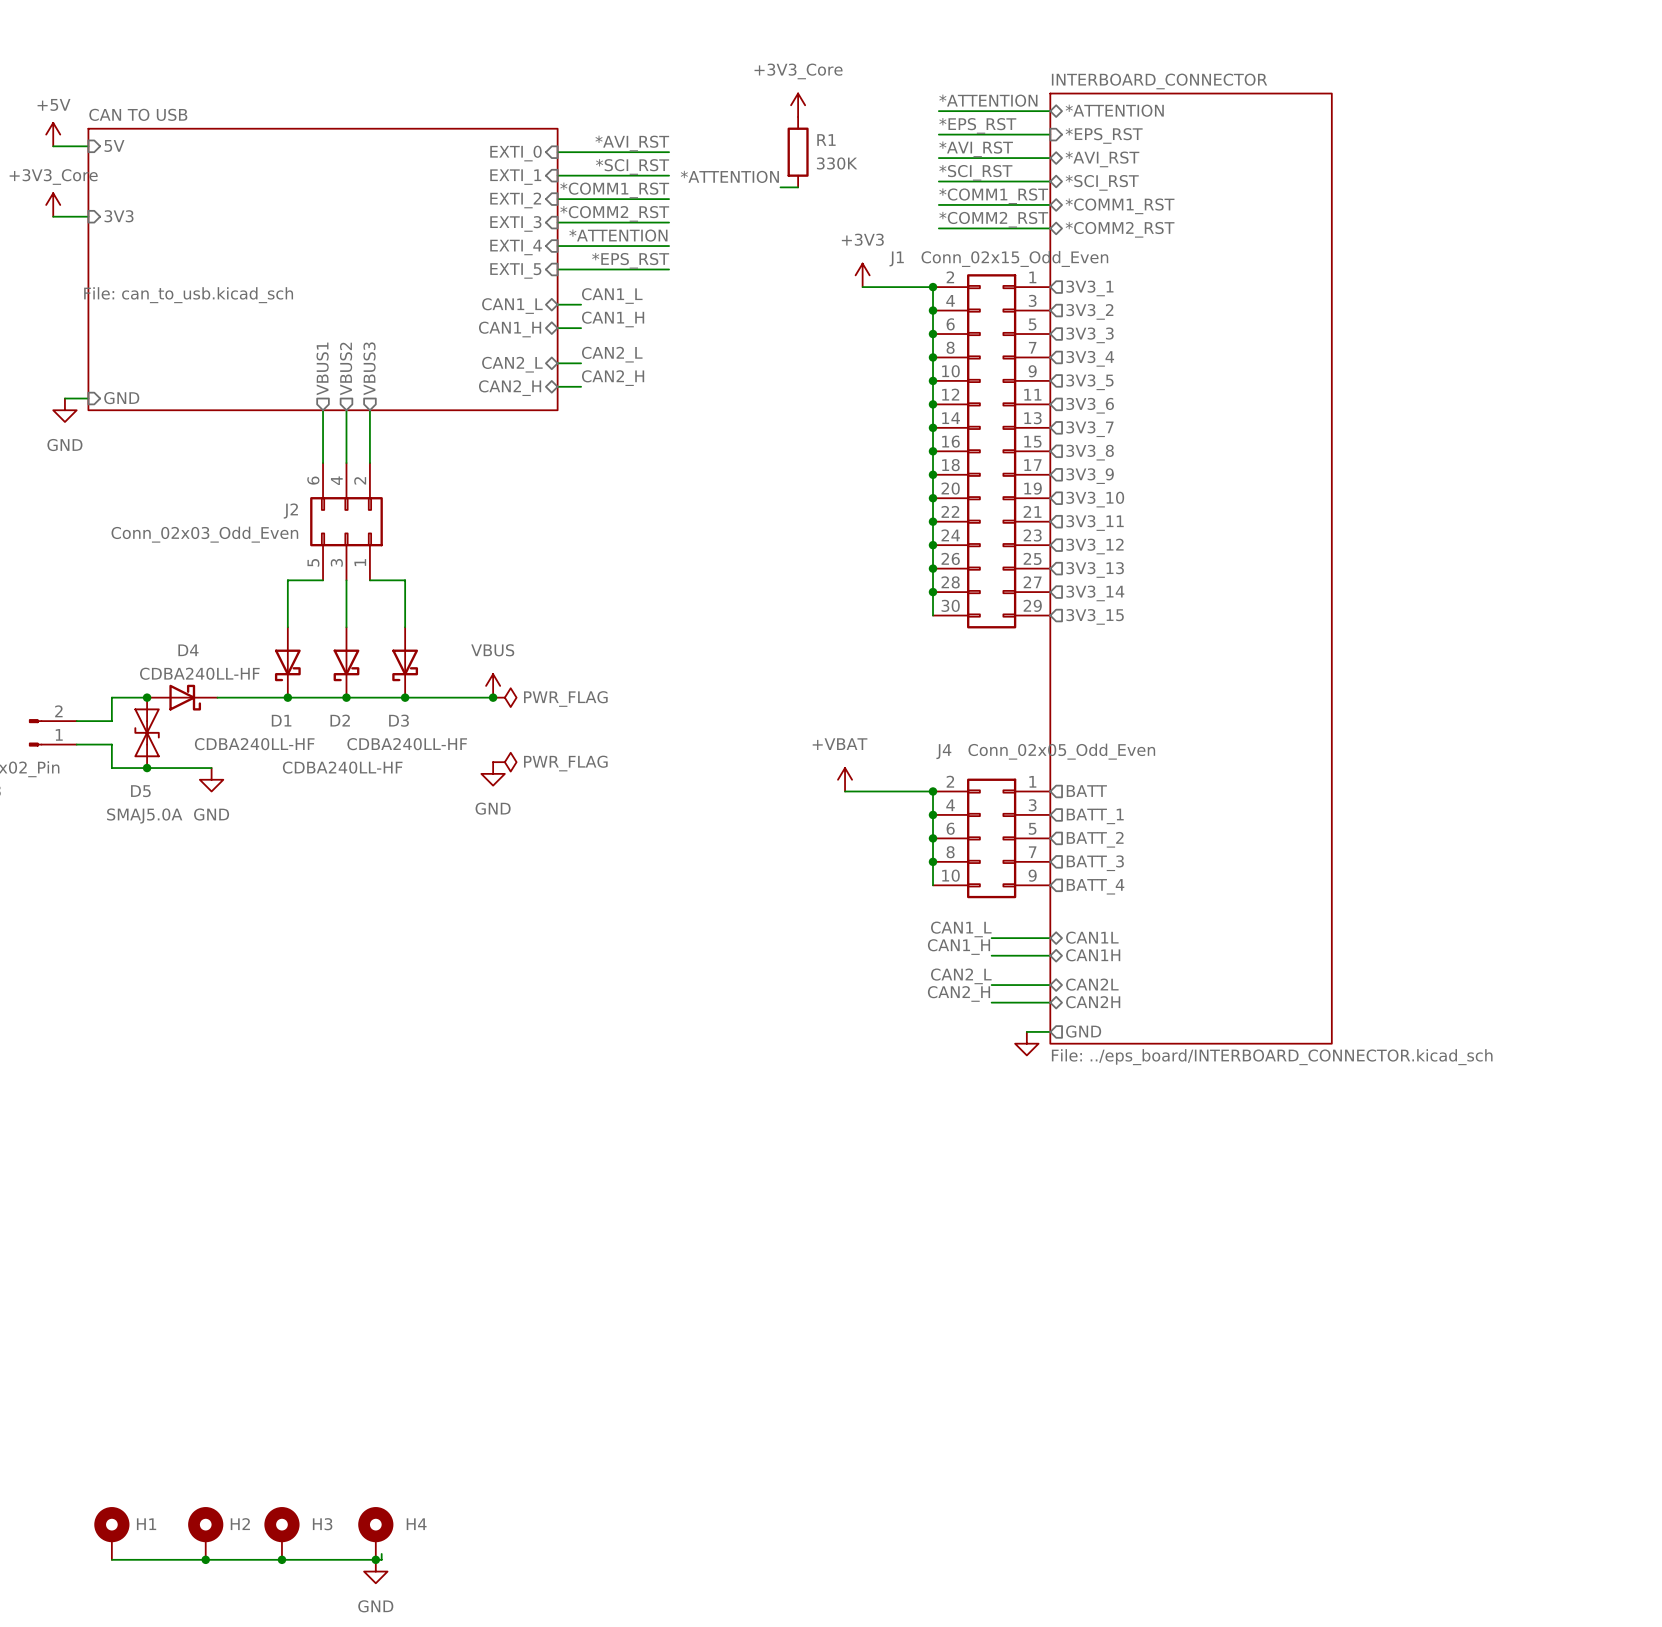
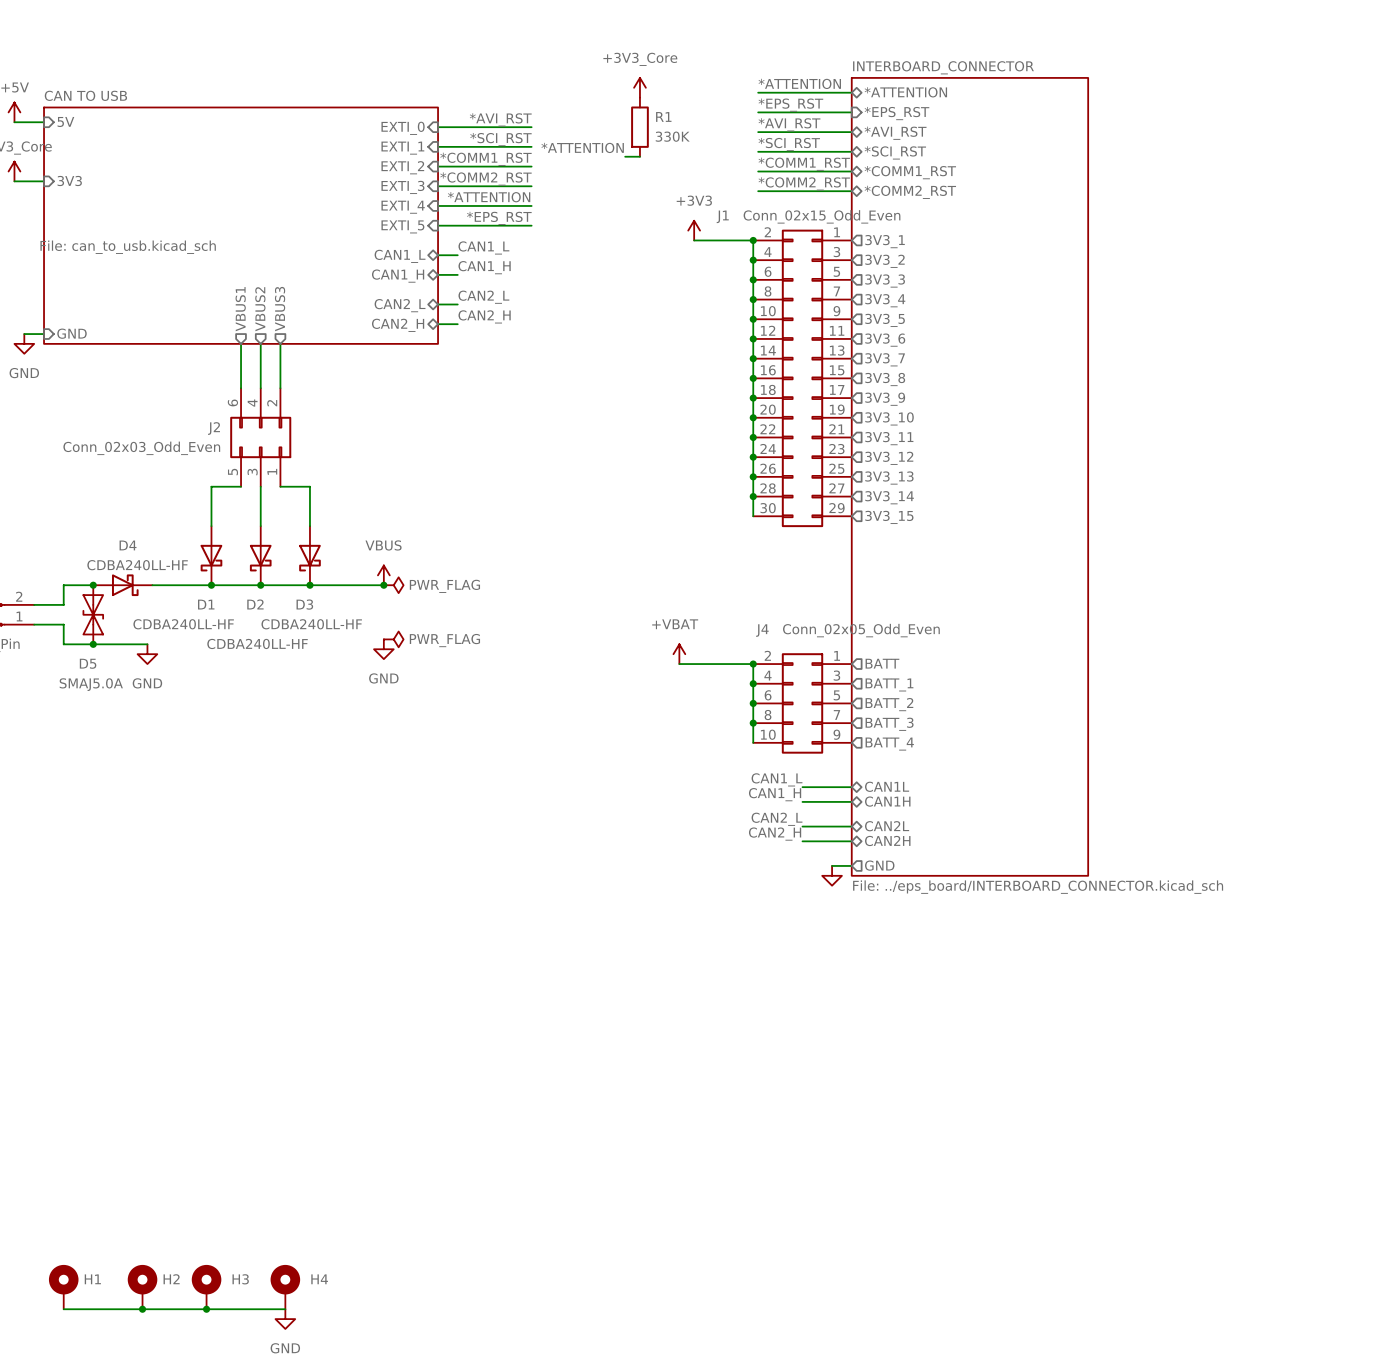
wire: (381, 1553) (381, 1559) (375, 1559) -> none
junction: (375, 1559) -> none

